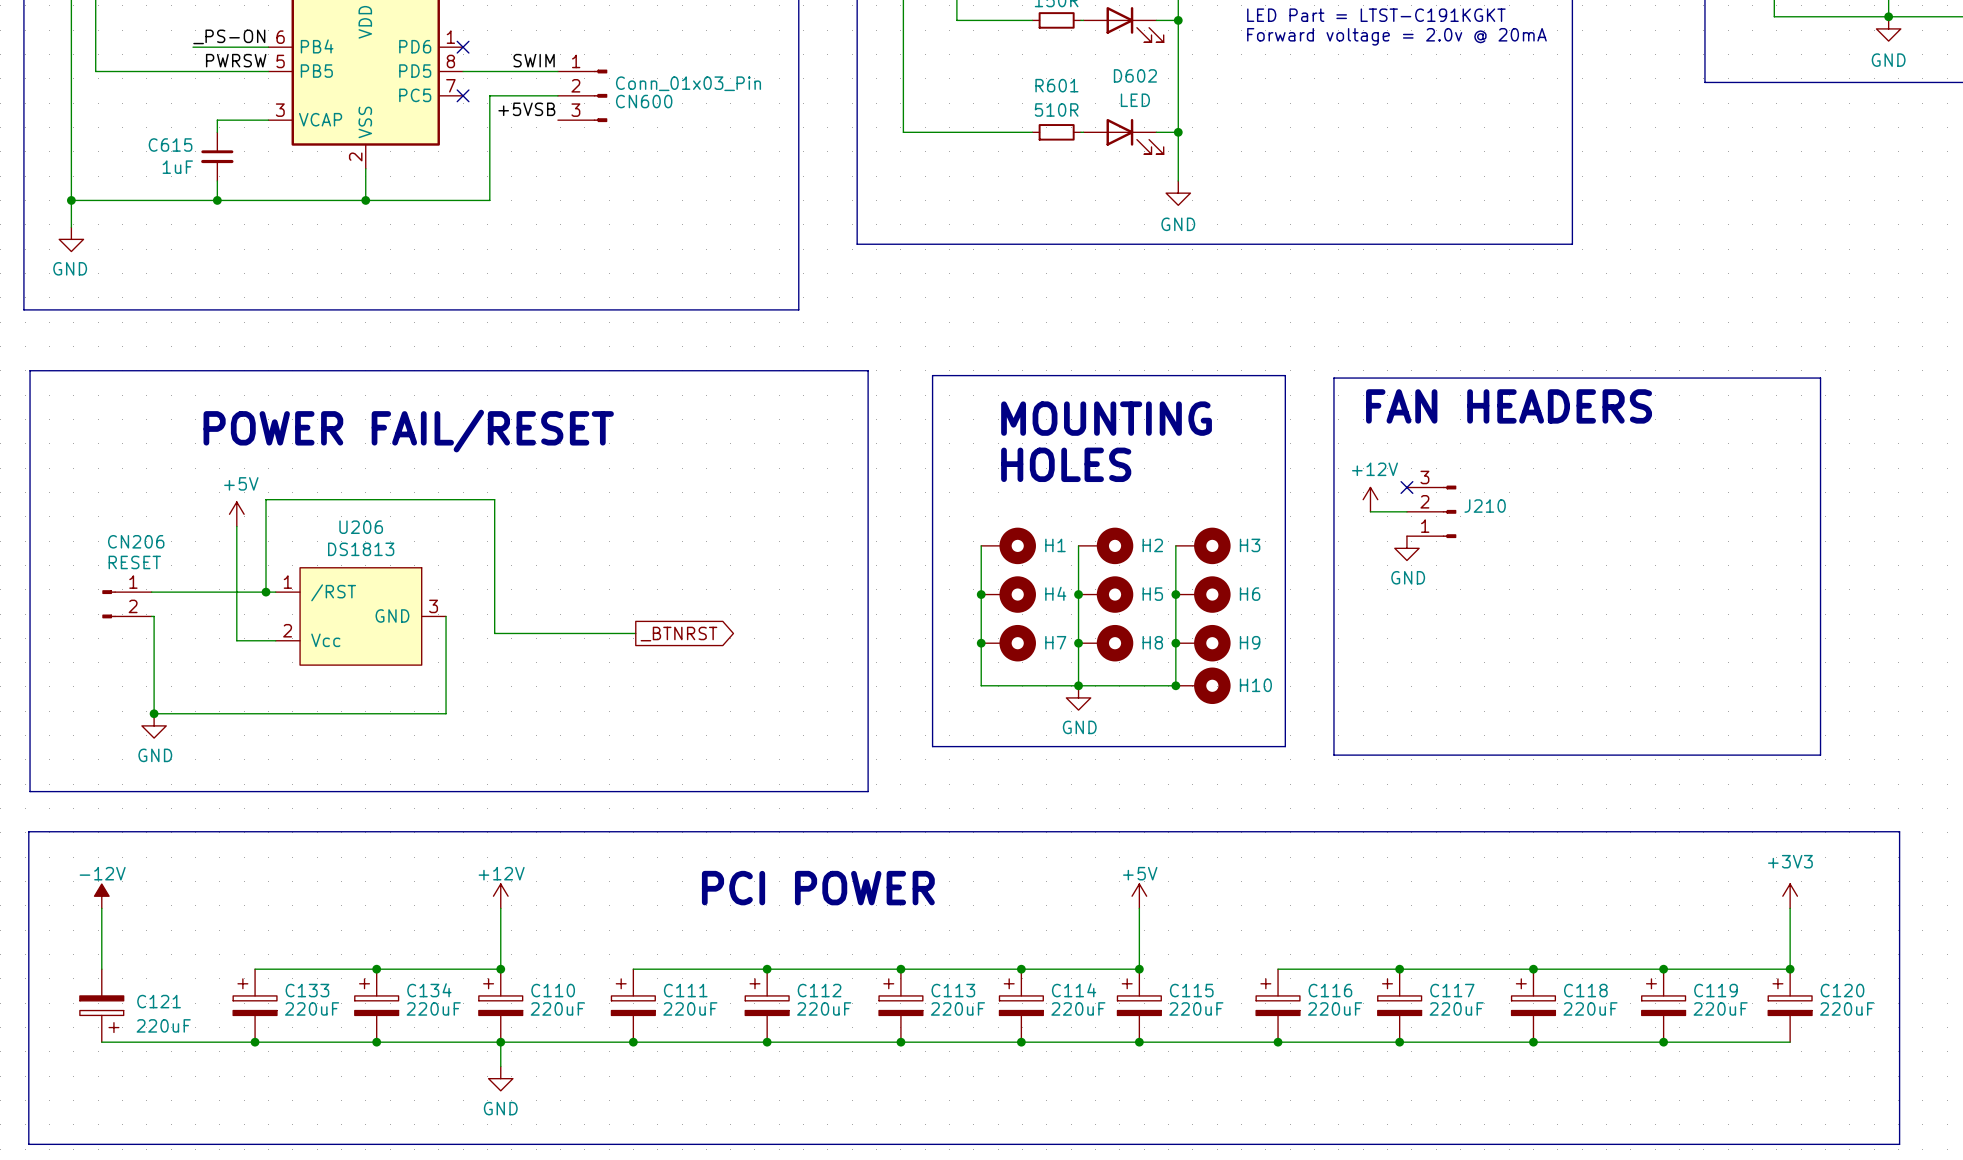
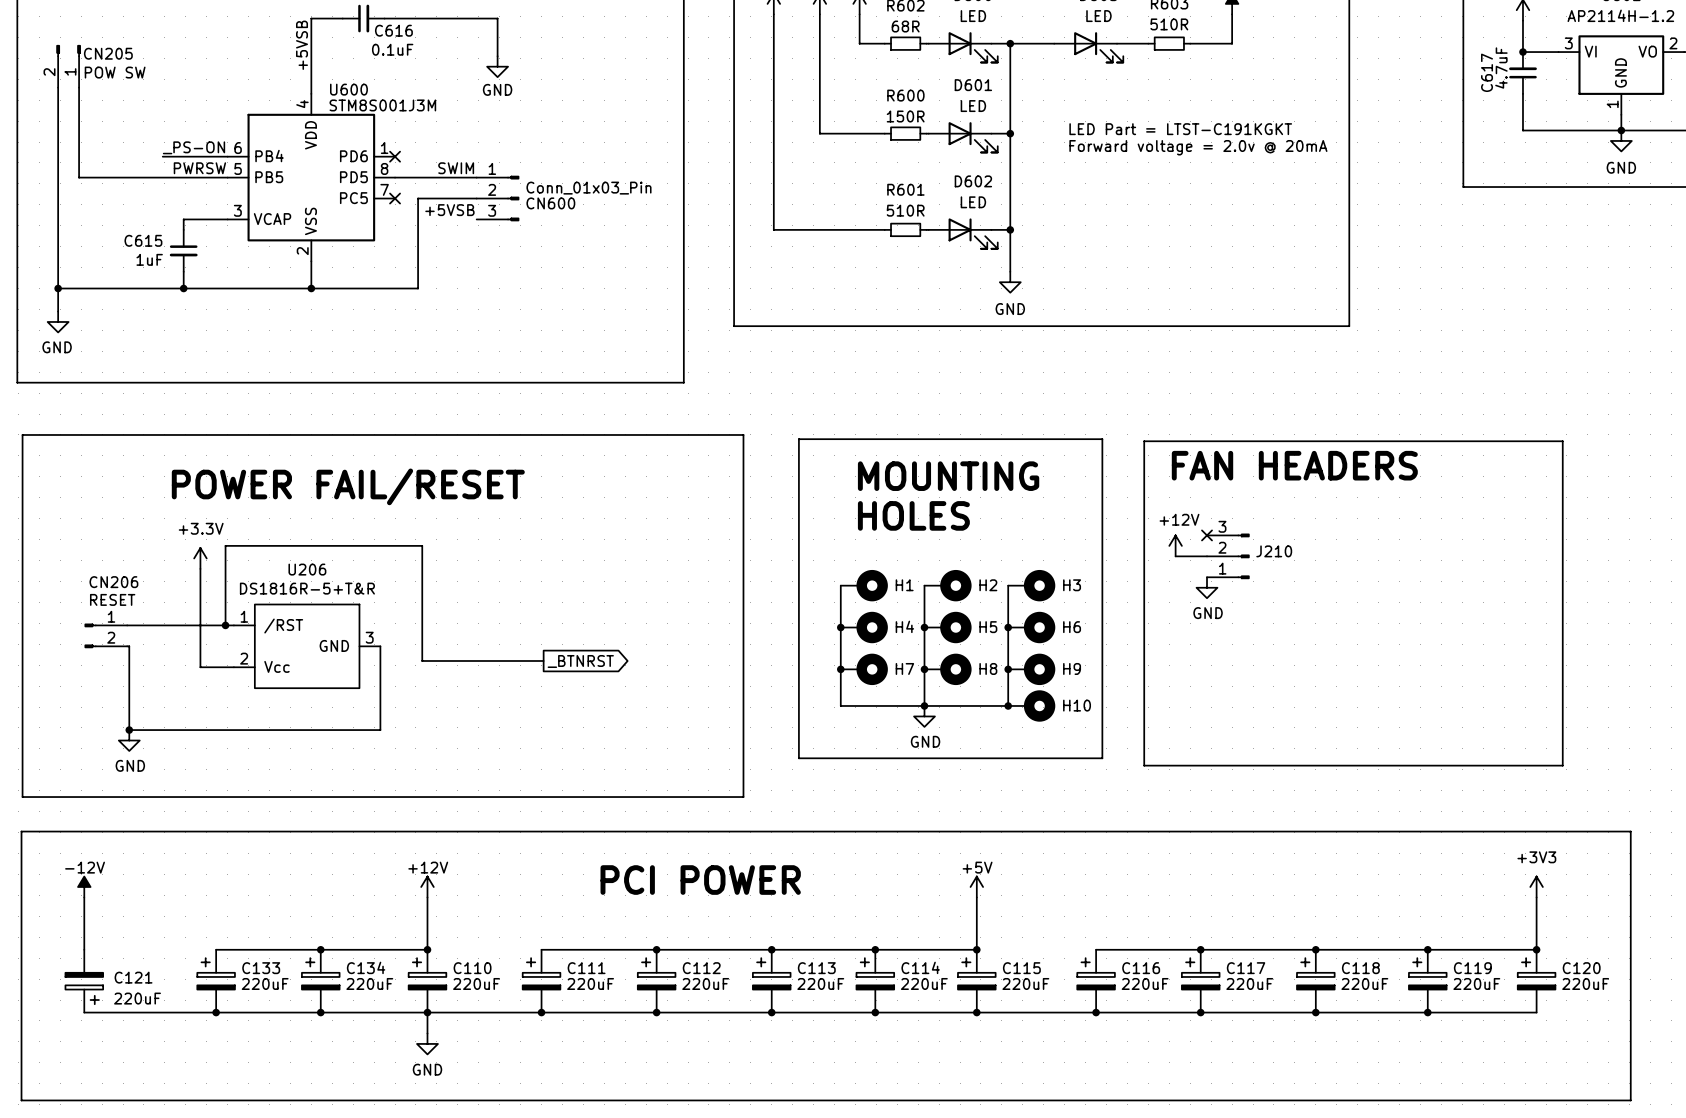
power symbol: +5V (236, 514) -> +3.3V (200, 558)
U206 value: DS1813 (361, 549) -> DS1816R-5+T&R (307, 588)

